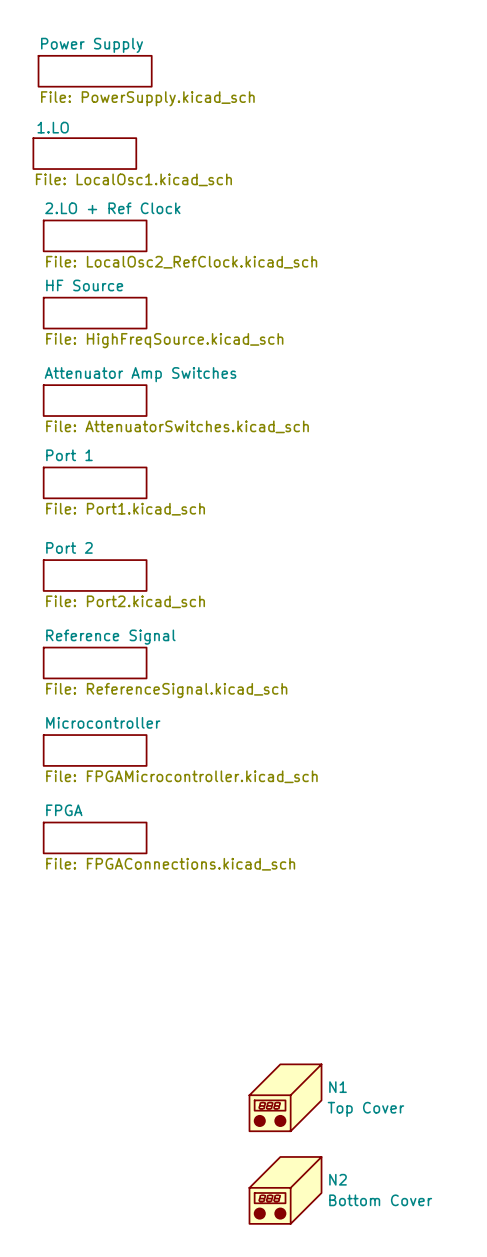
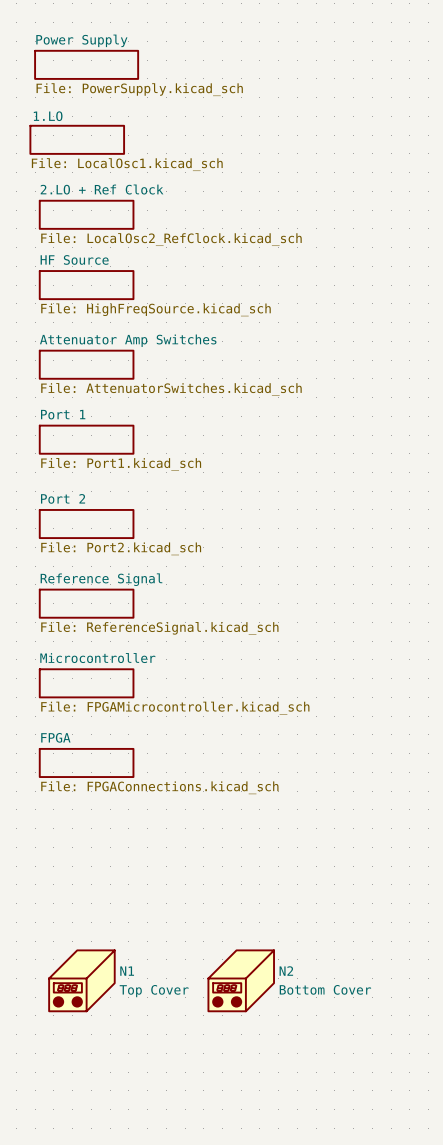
N1 position: (285, 1097) -> (81, 980)
N2 position: (285, 1190) -> (241, 980)

